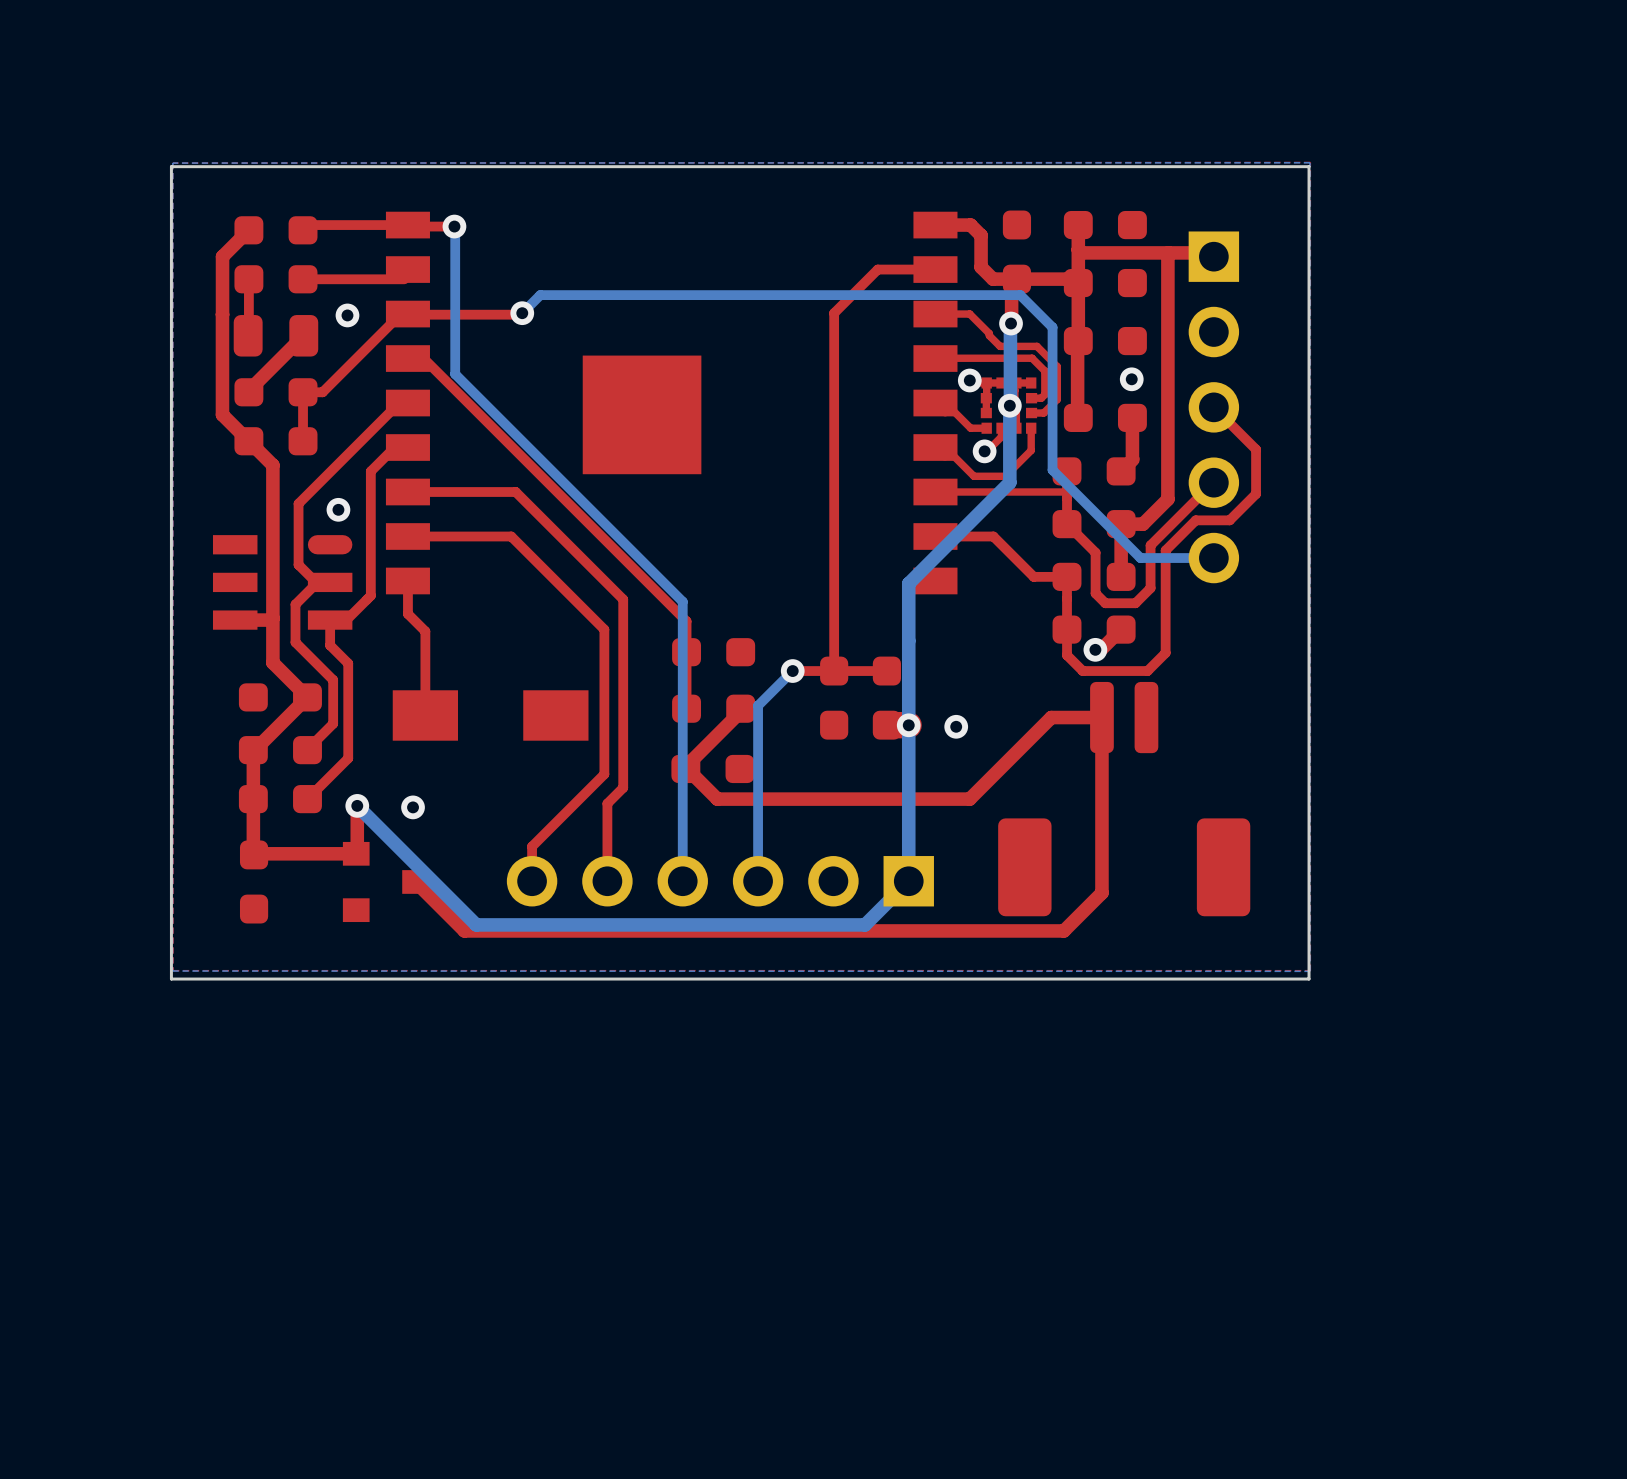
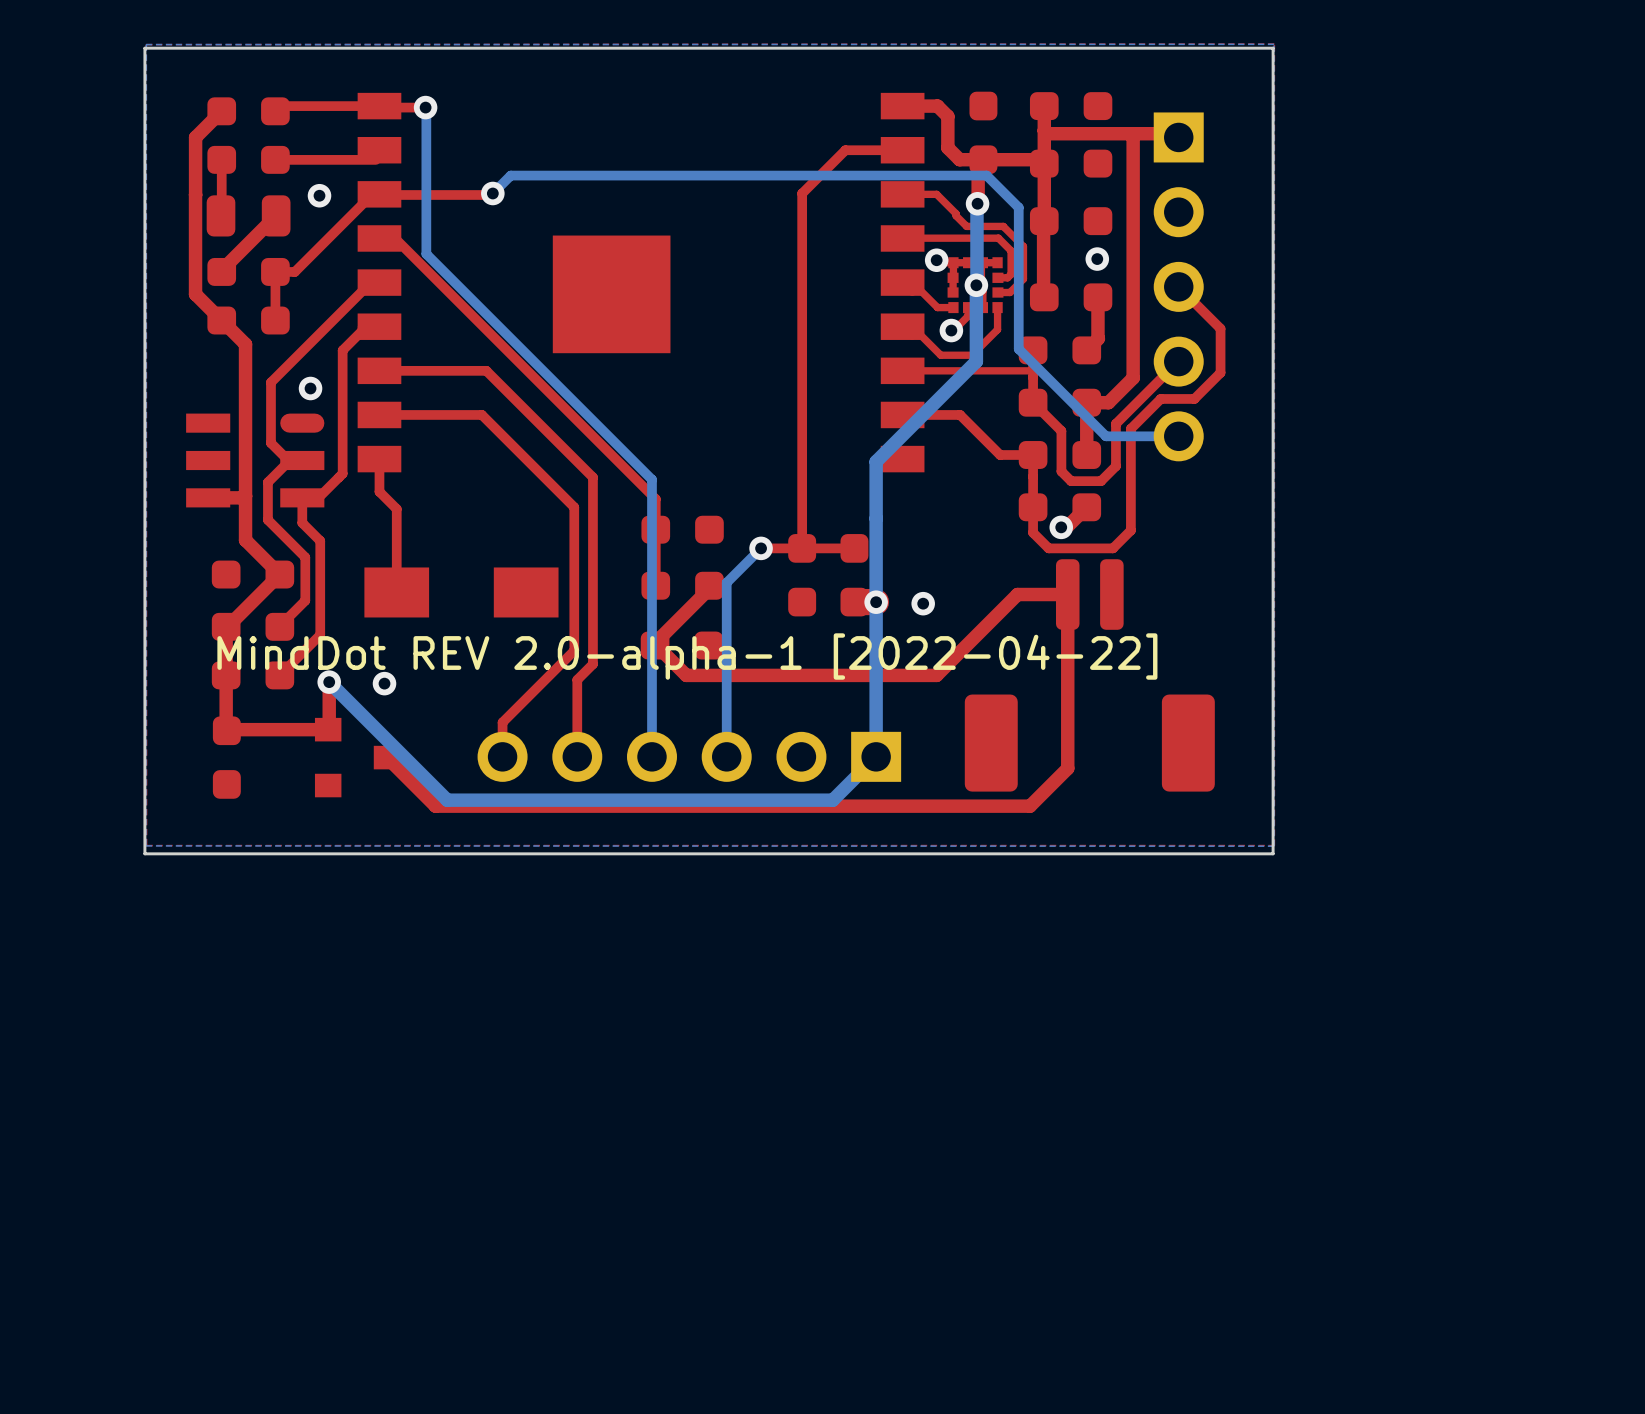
text: none -> MindDot REV 2.0-alpha-1 [2022-04-22] (687, 656)

